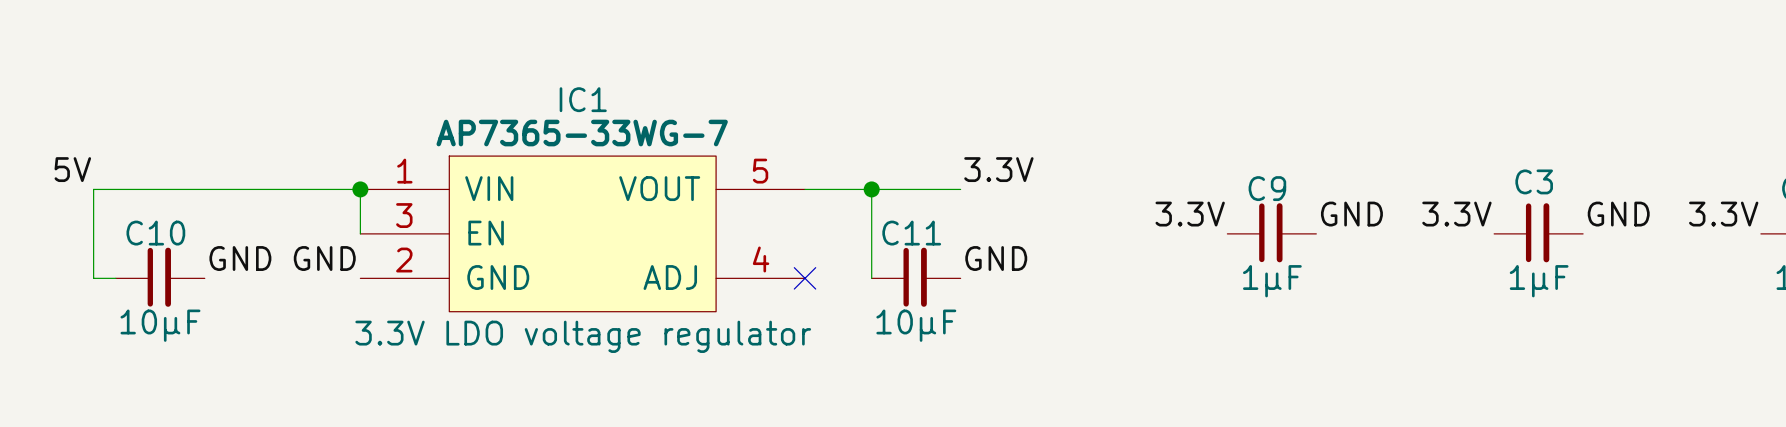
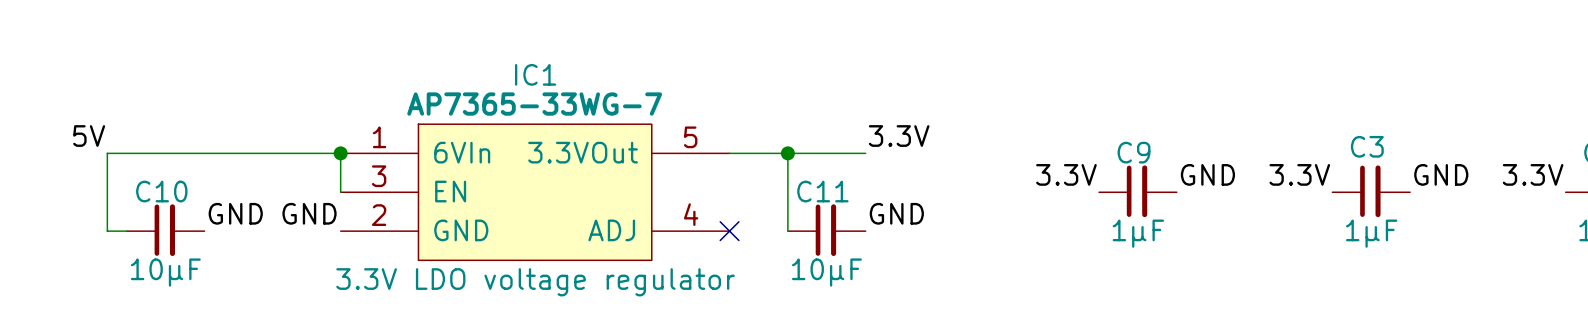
IC1 pin name: VIN (489, 188) -> 6VIn (462, 152)
IC1 pin name: VOUT (659, 188) -> 3.3VOut (583, 152)

